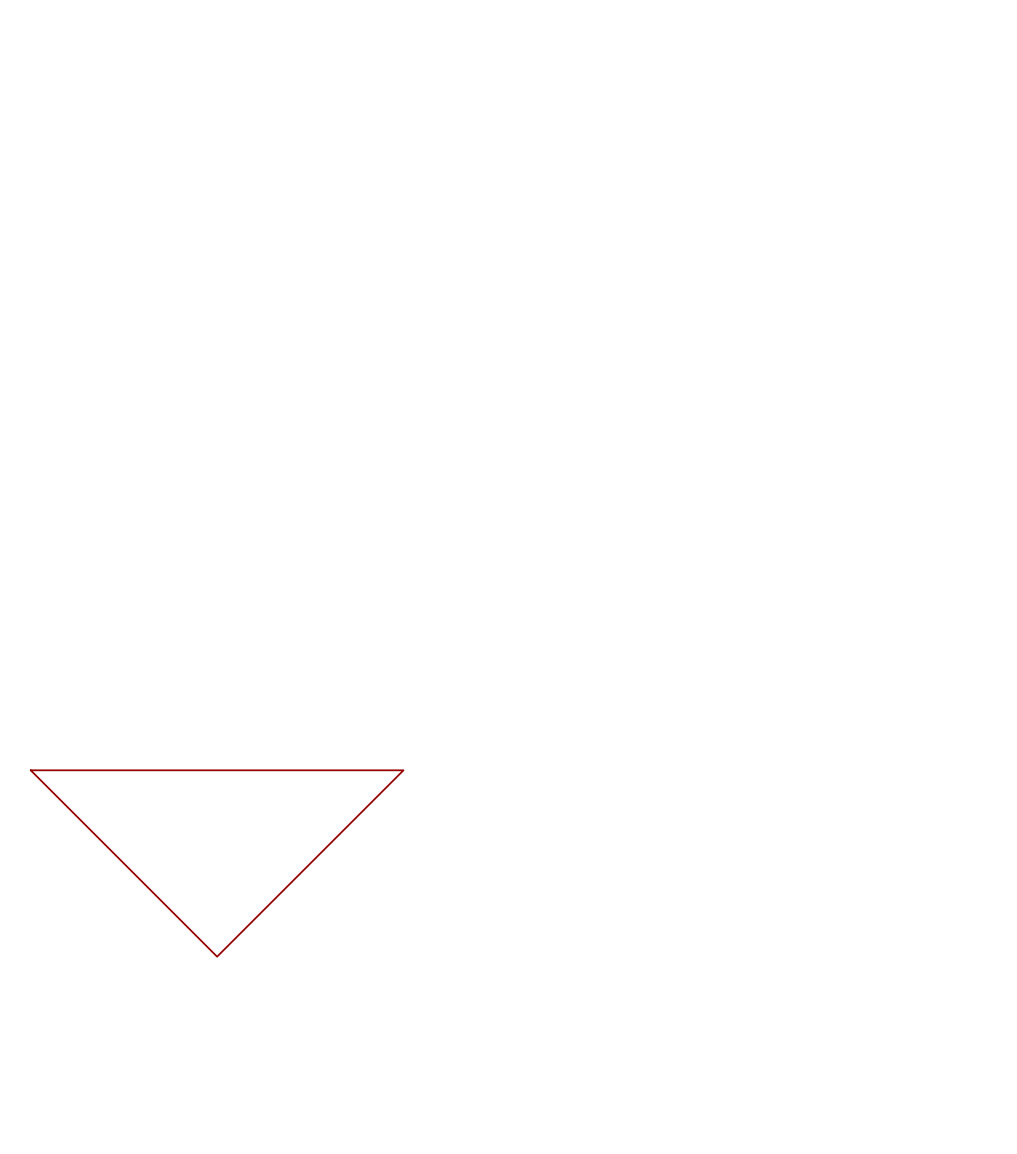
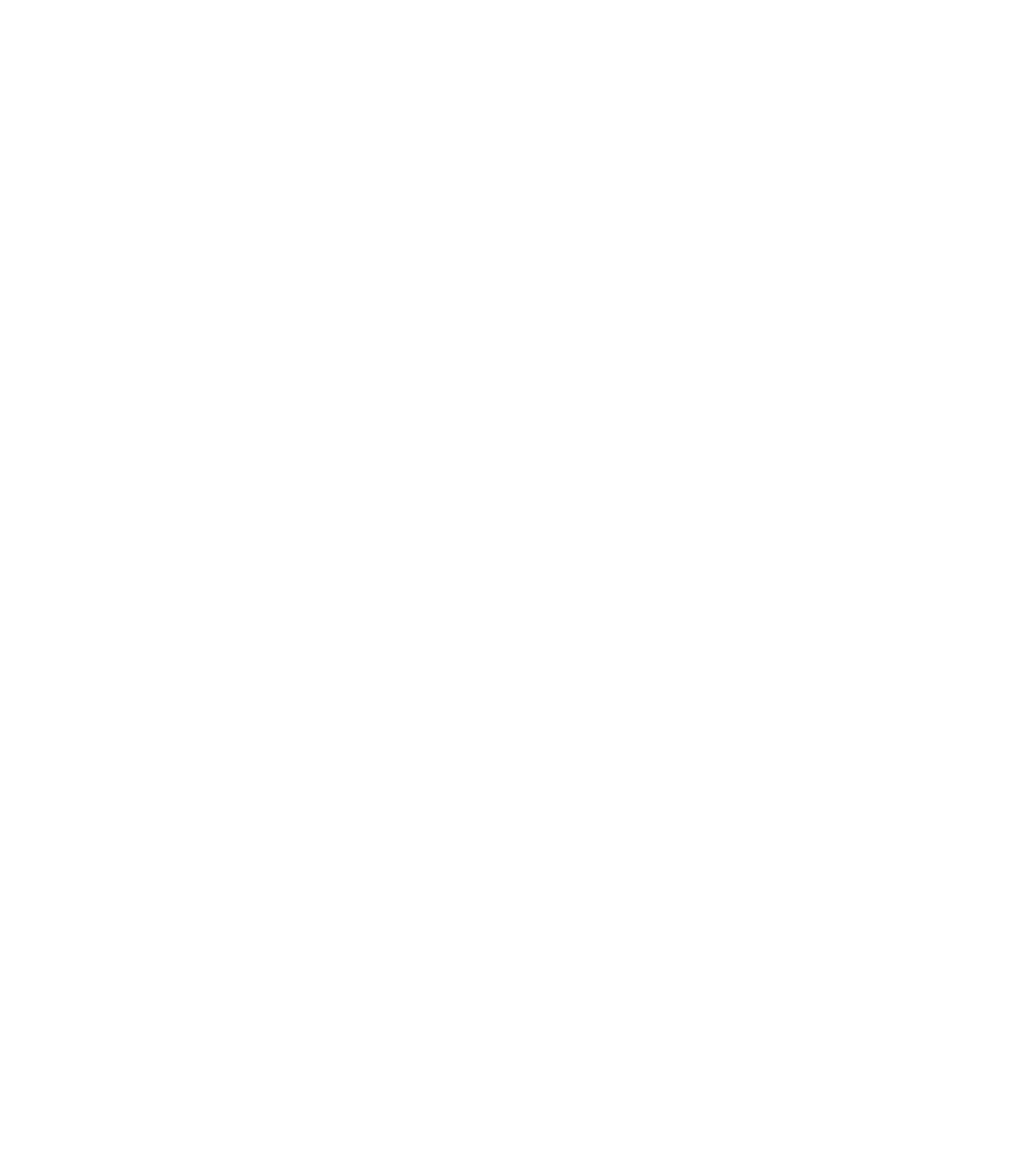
power symbol: (217, 863) -> none

